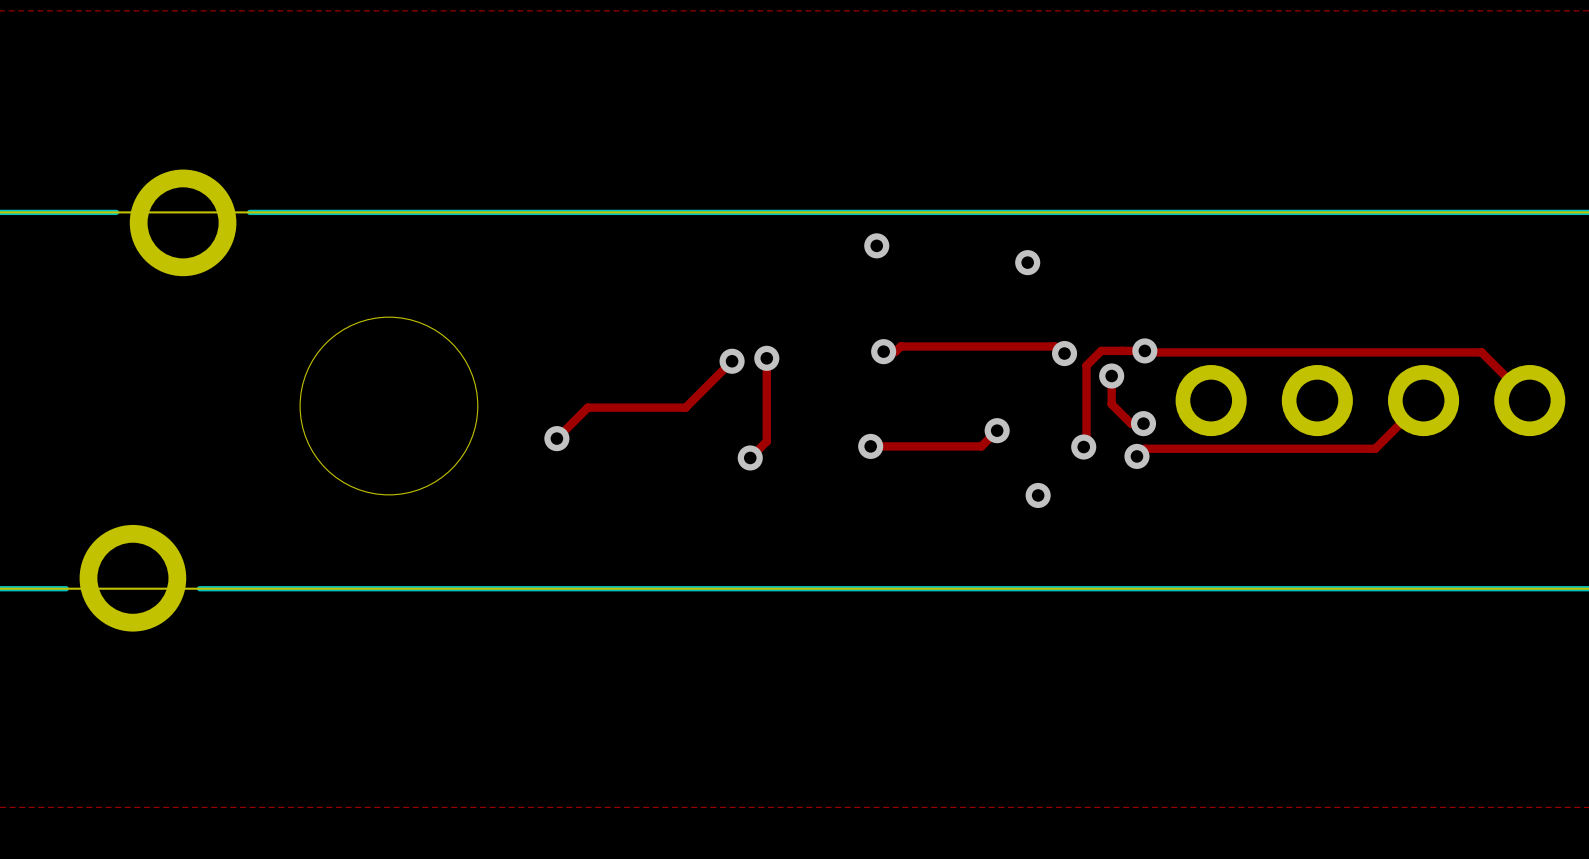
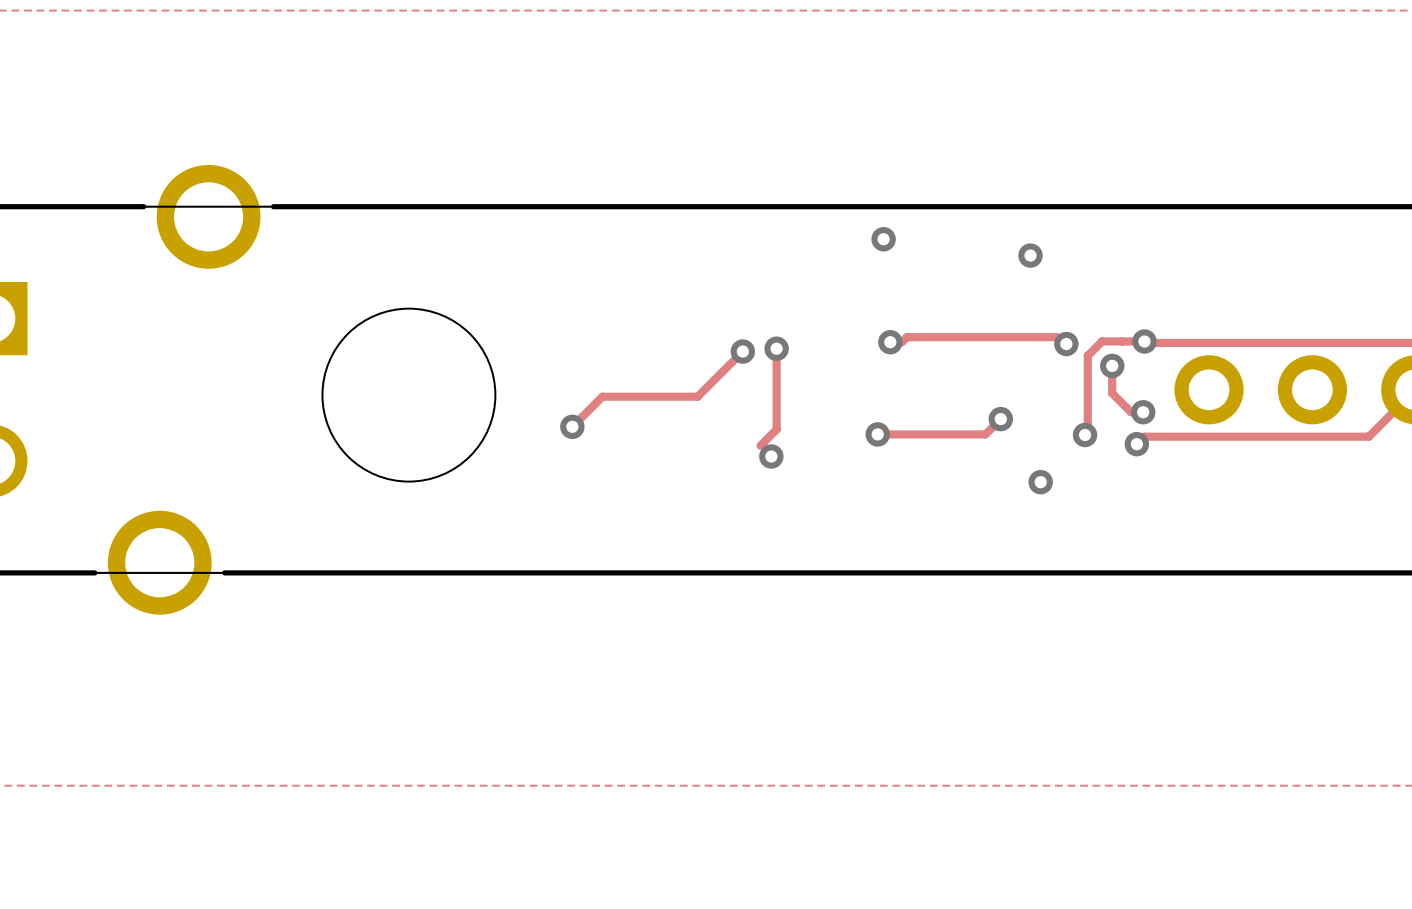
via position: (750, 457) -> (771, 456)

